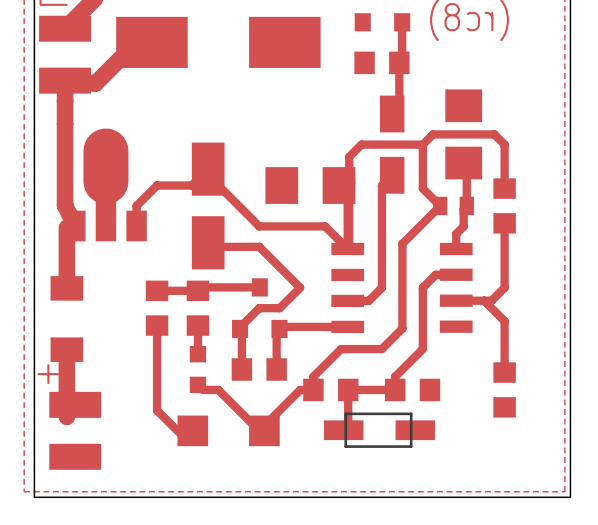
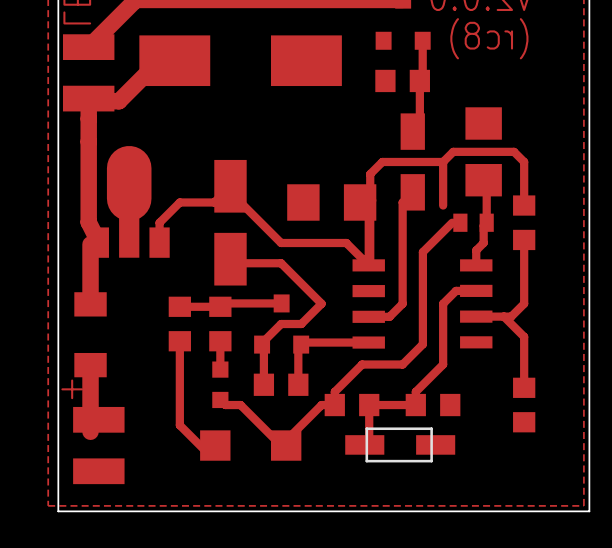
top track: (422, 188) (440, 205) (402, 243) -> (452, 222) (422, 252) (422, 260)

